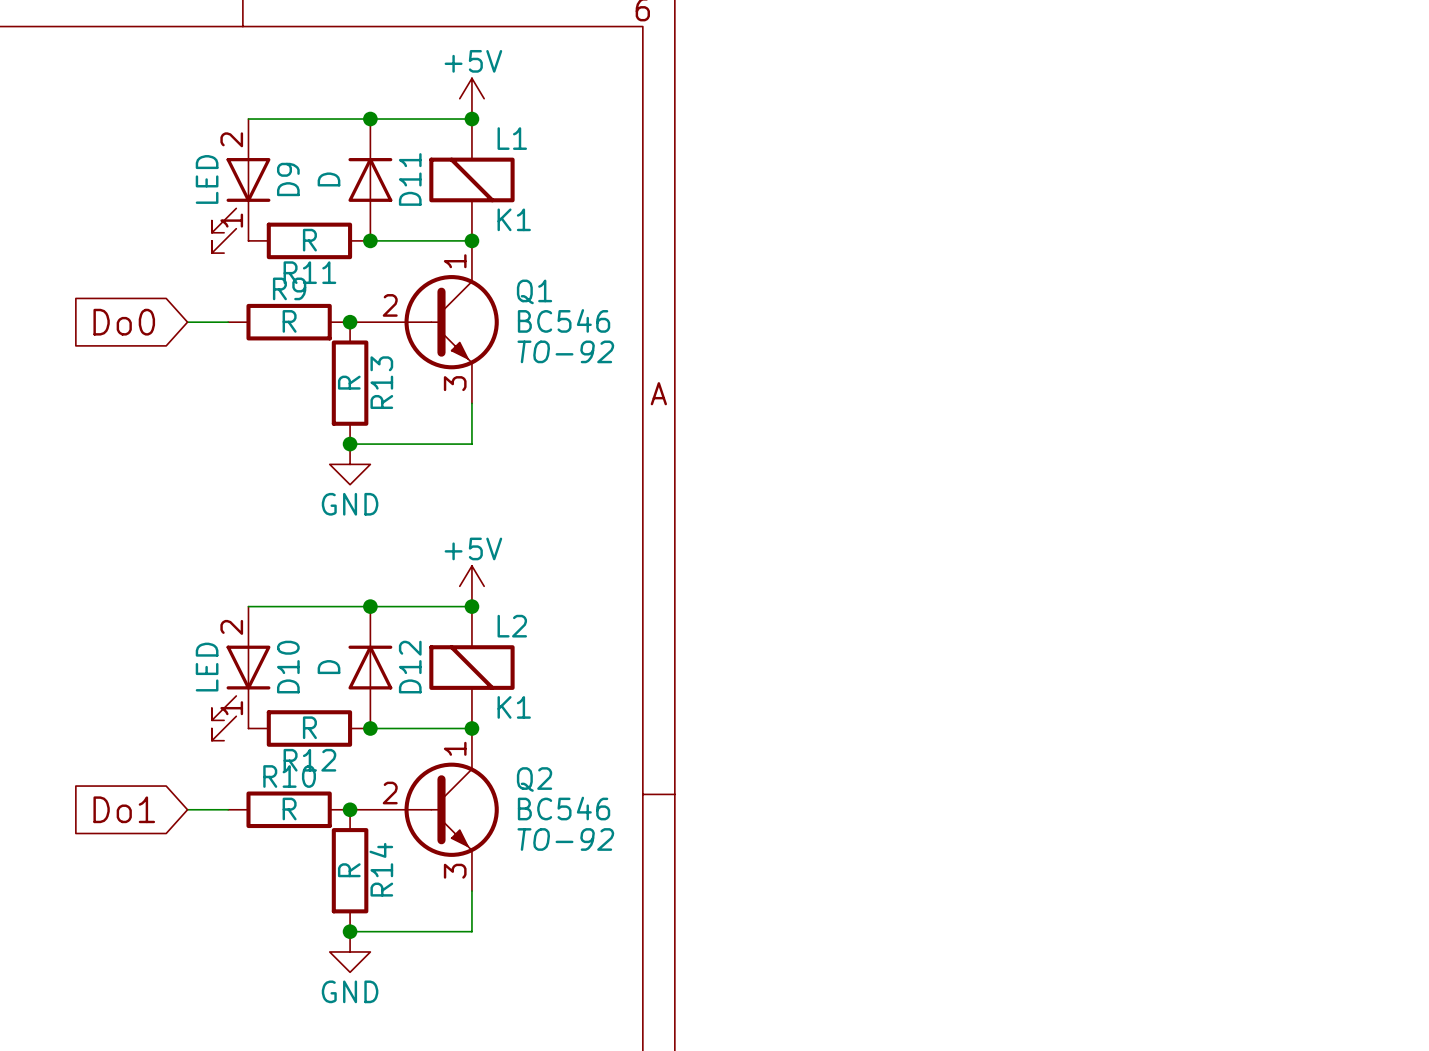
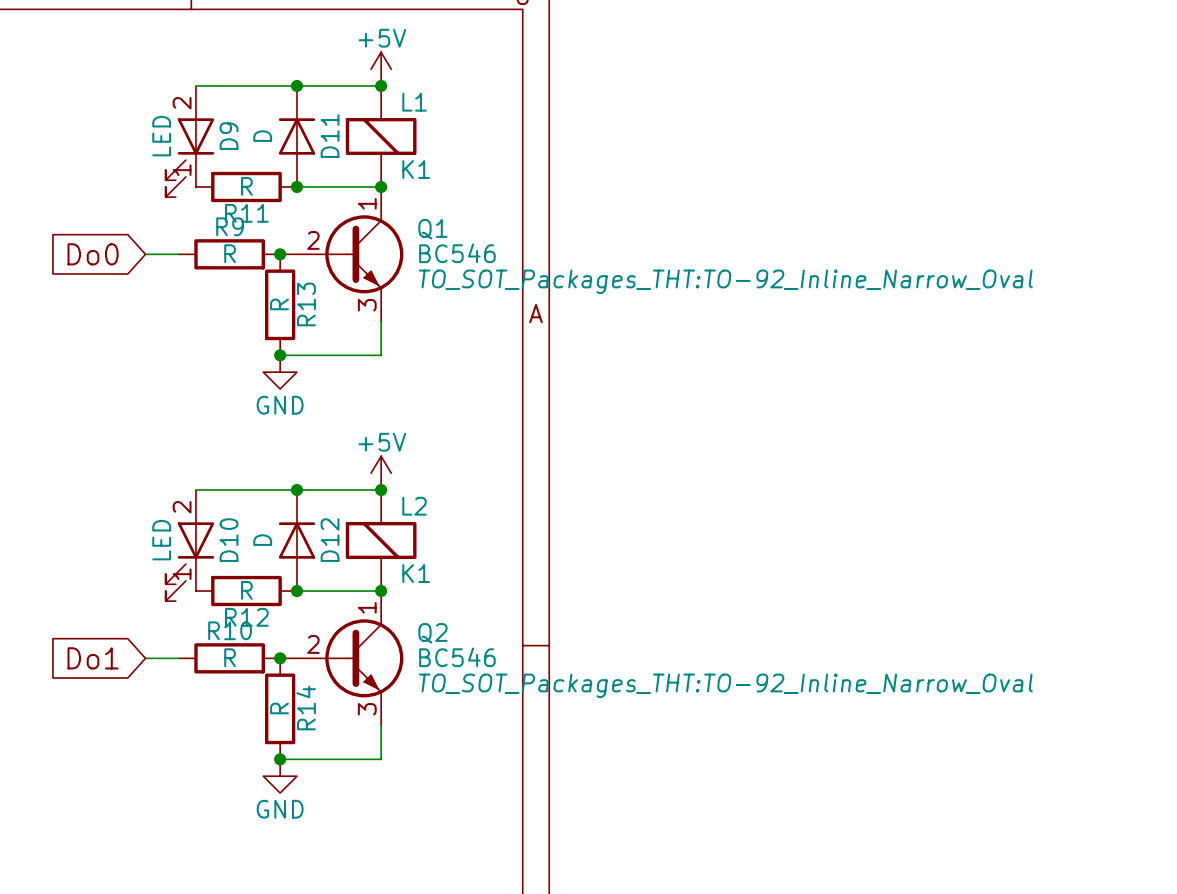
Q1 text: TO-92 (565, 351) -> TO_SOT_Packages_THT:TO-92_Inline_Narrow_Oval (725, 281)
Q2 text: TO-92 (565, 839) -> TO_SOT_Packages_THT:TO-92_Inline_Narrow_Oval (725, 685)

